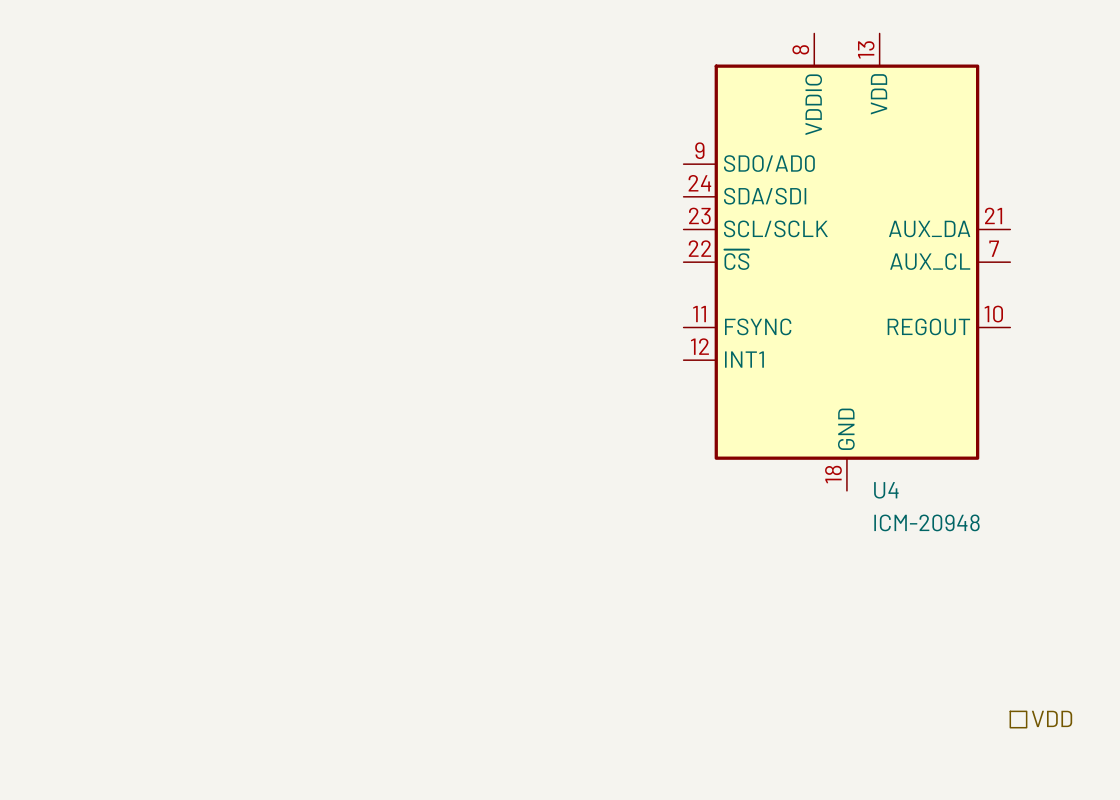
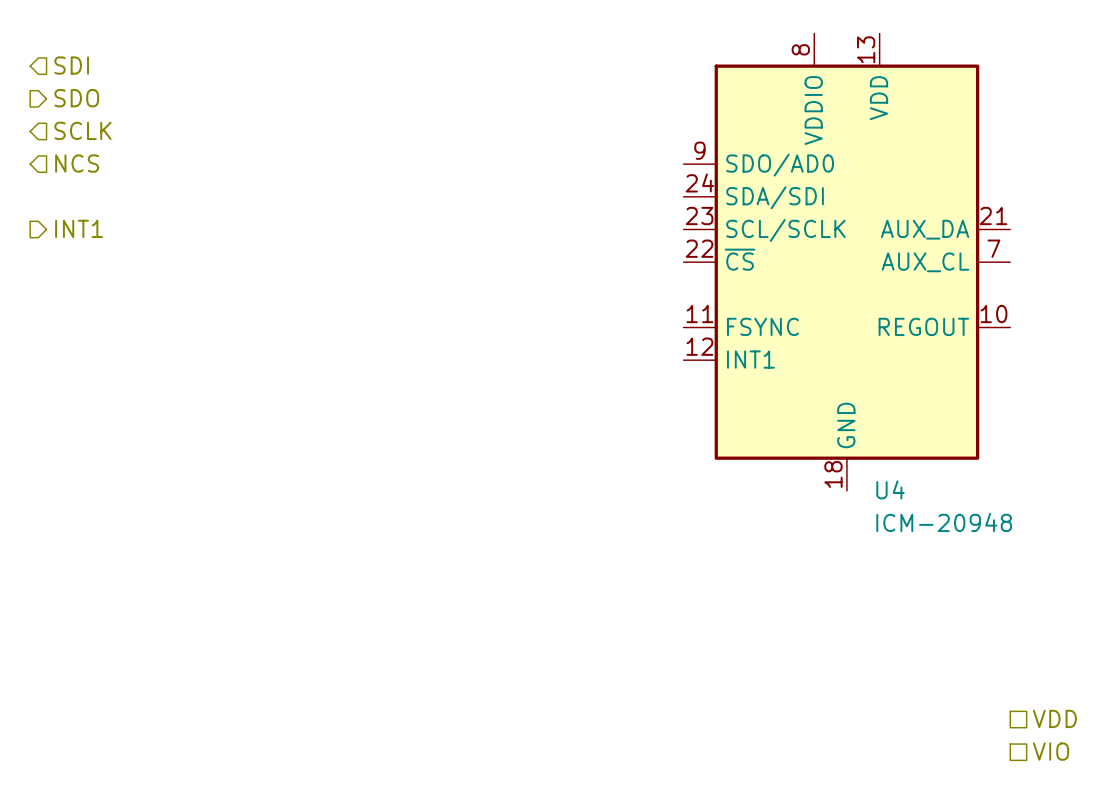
hierarchical label: none -> SDI (71, 65)
hierarchical label: none -> SDO (76, 98)
hierarchical label: none -> SCLK (82, 130)
hierarchical label: none -> NCS (77, 163)
hierarchical label: none -> INT1 (79, 228)
hierarchical label: none -> VIO (1051, 751)

